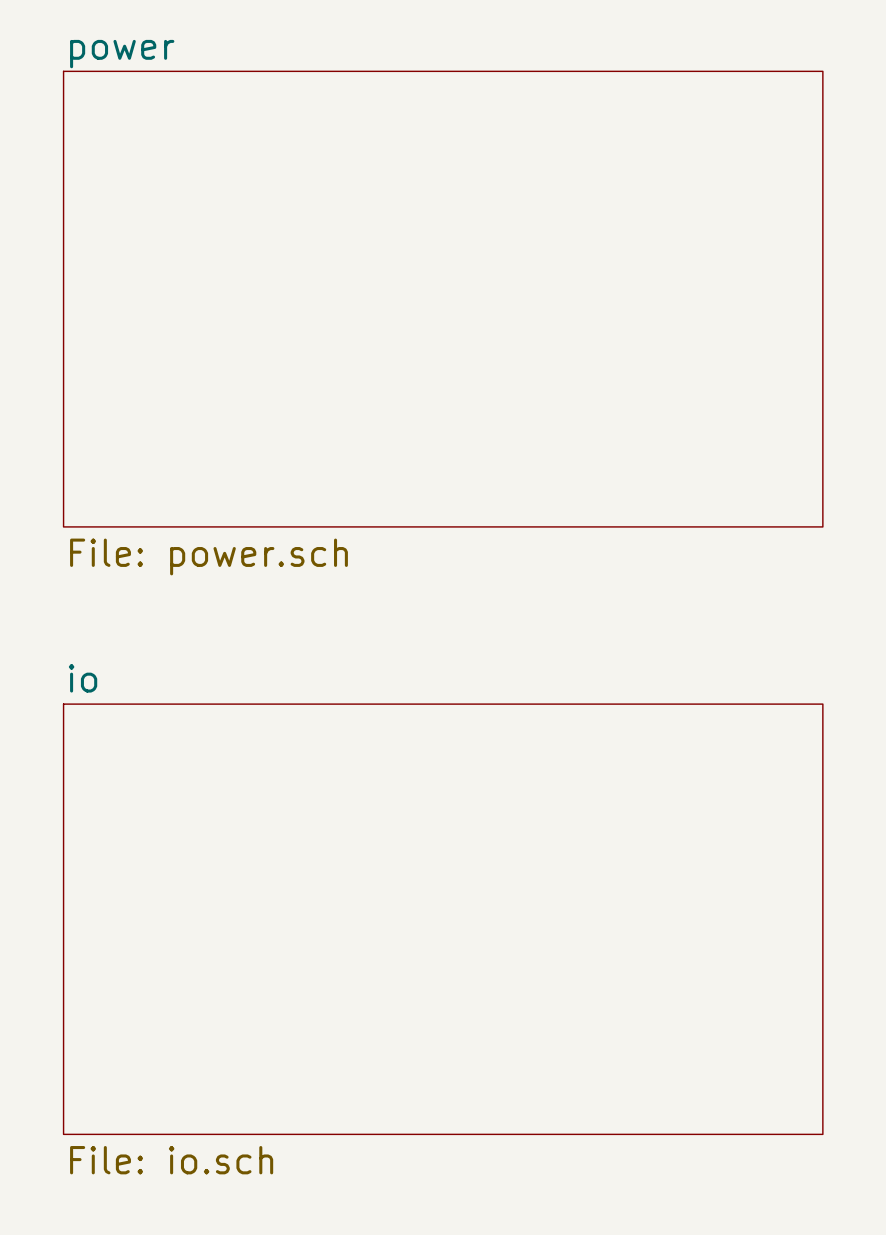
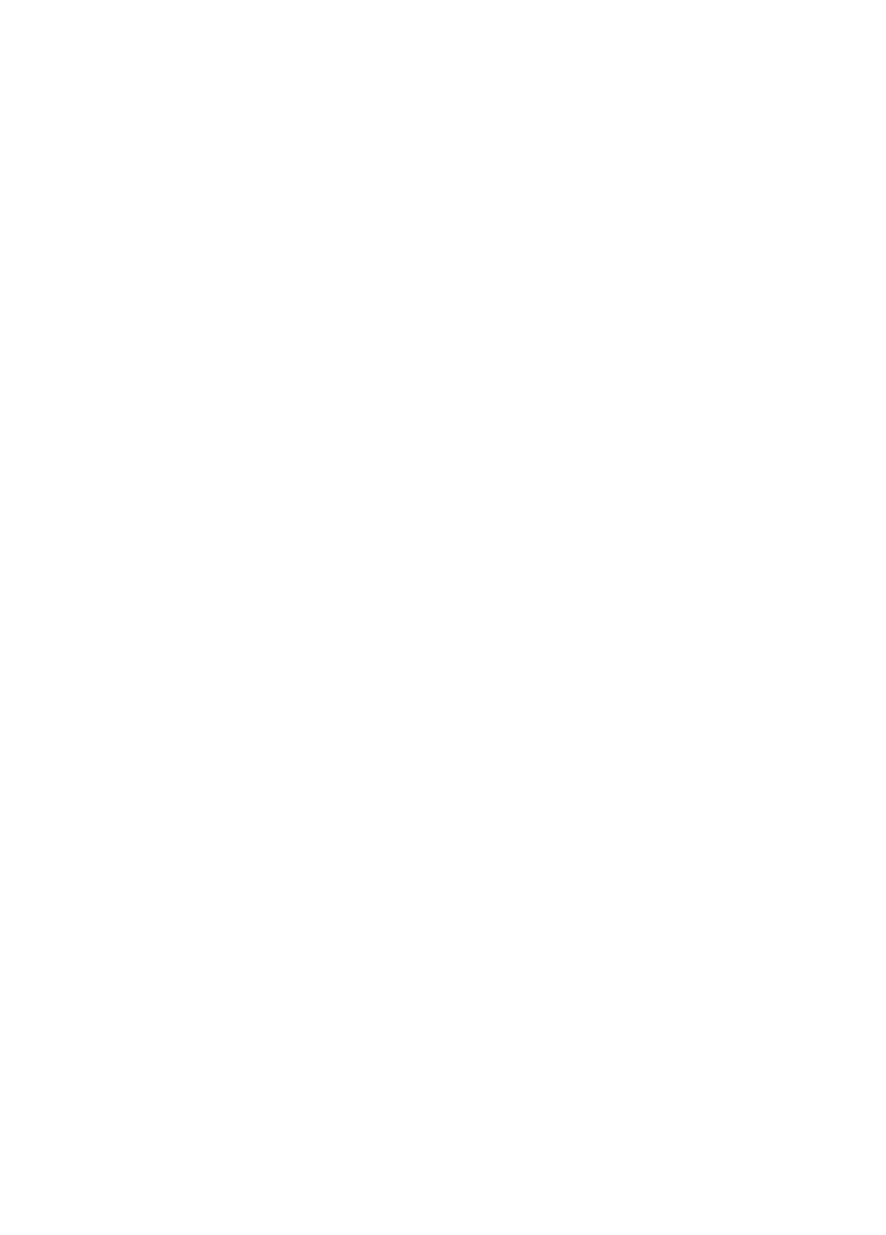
sheet power: File: power.sch (443, 299) -> none
sheet io: File: io.sch (443, 919) -> none

